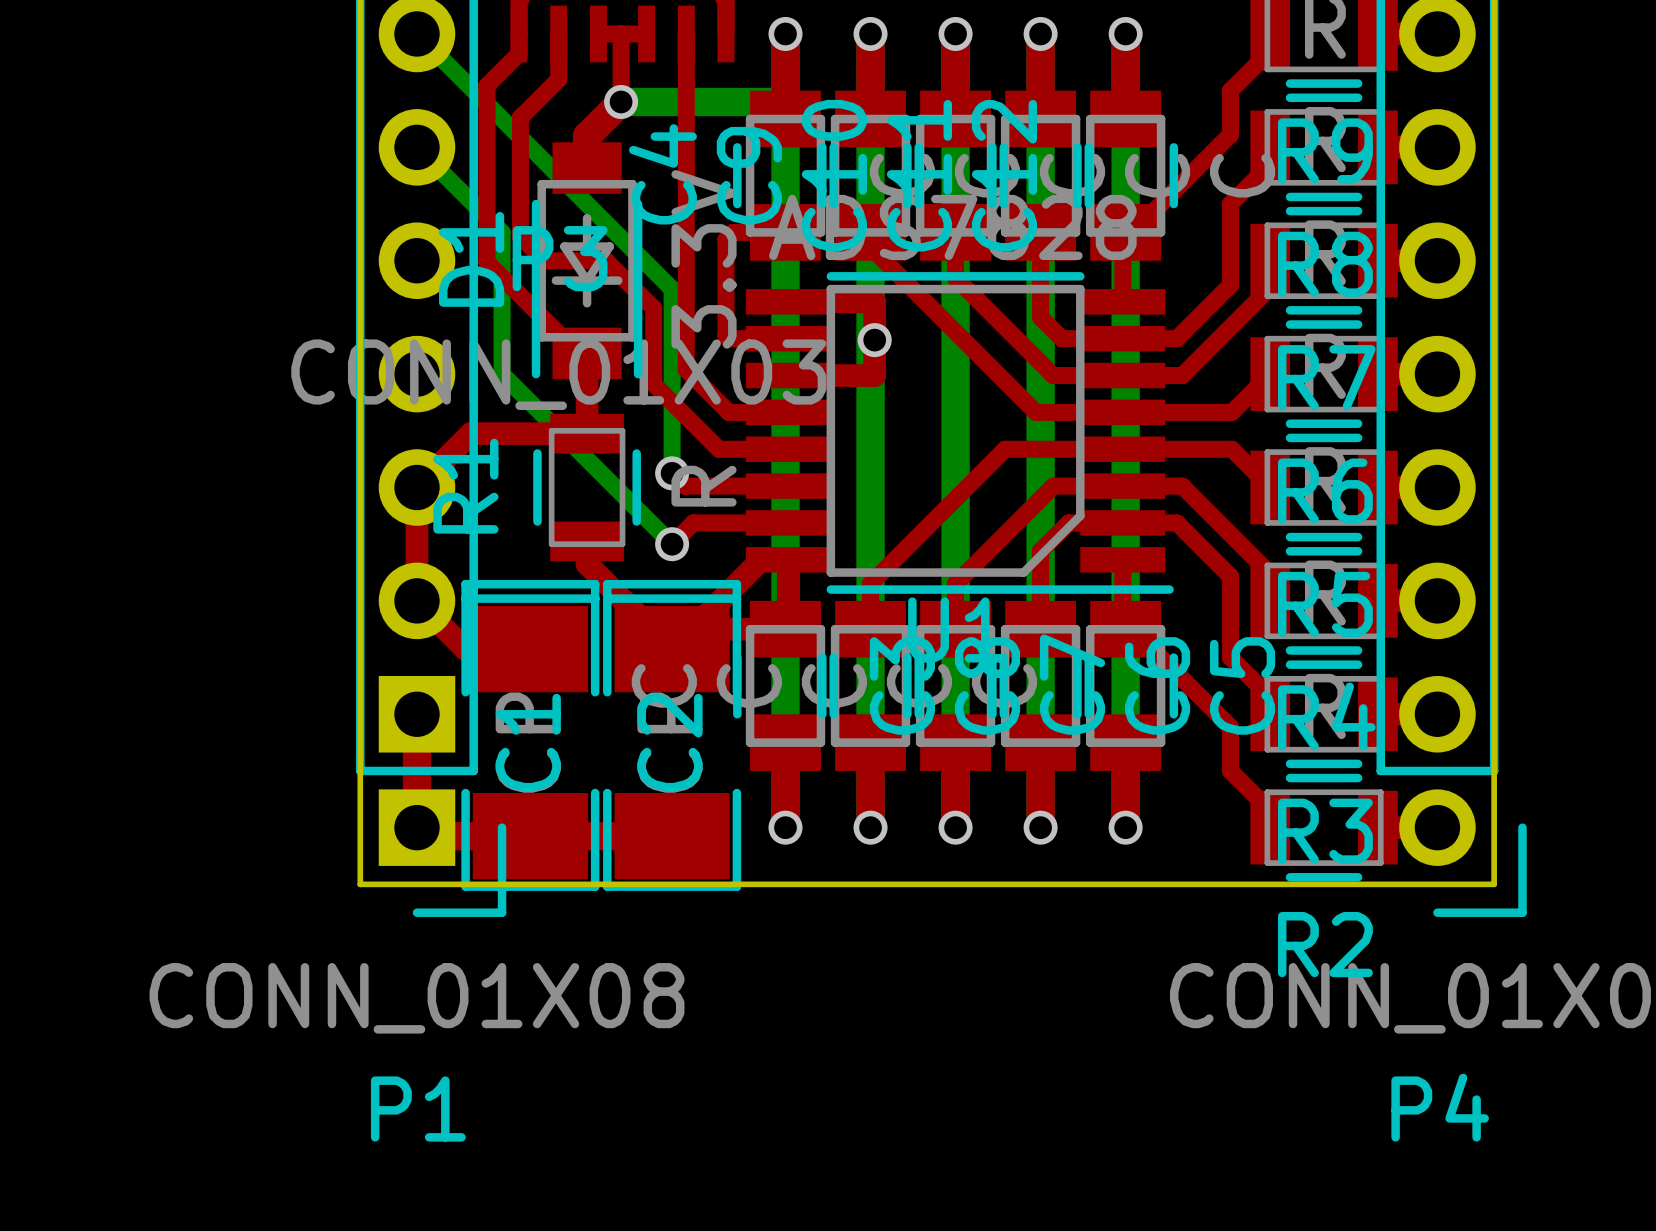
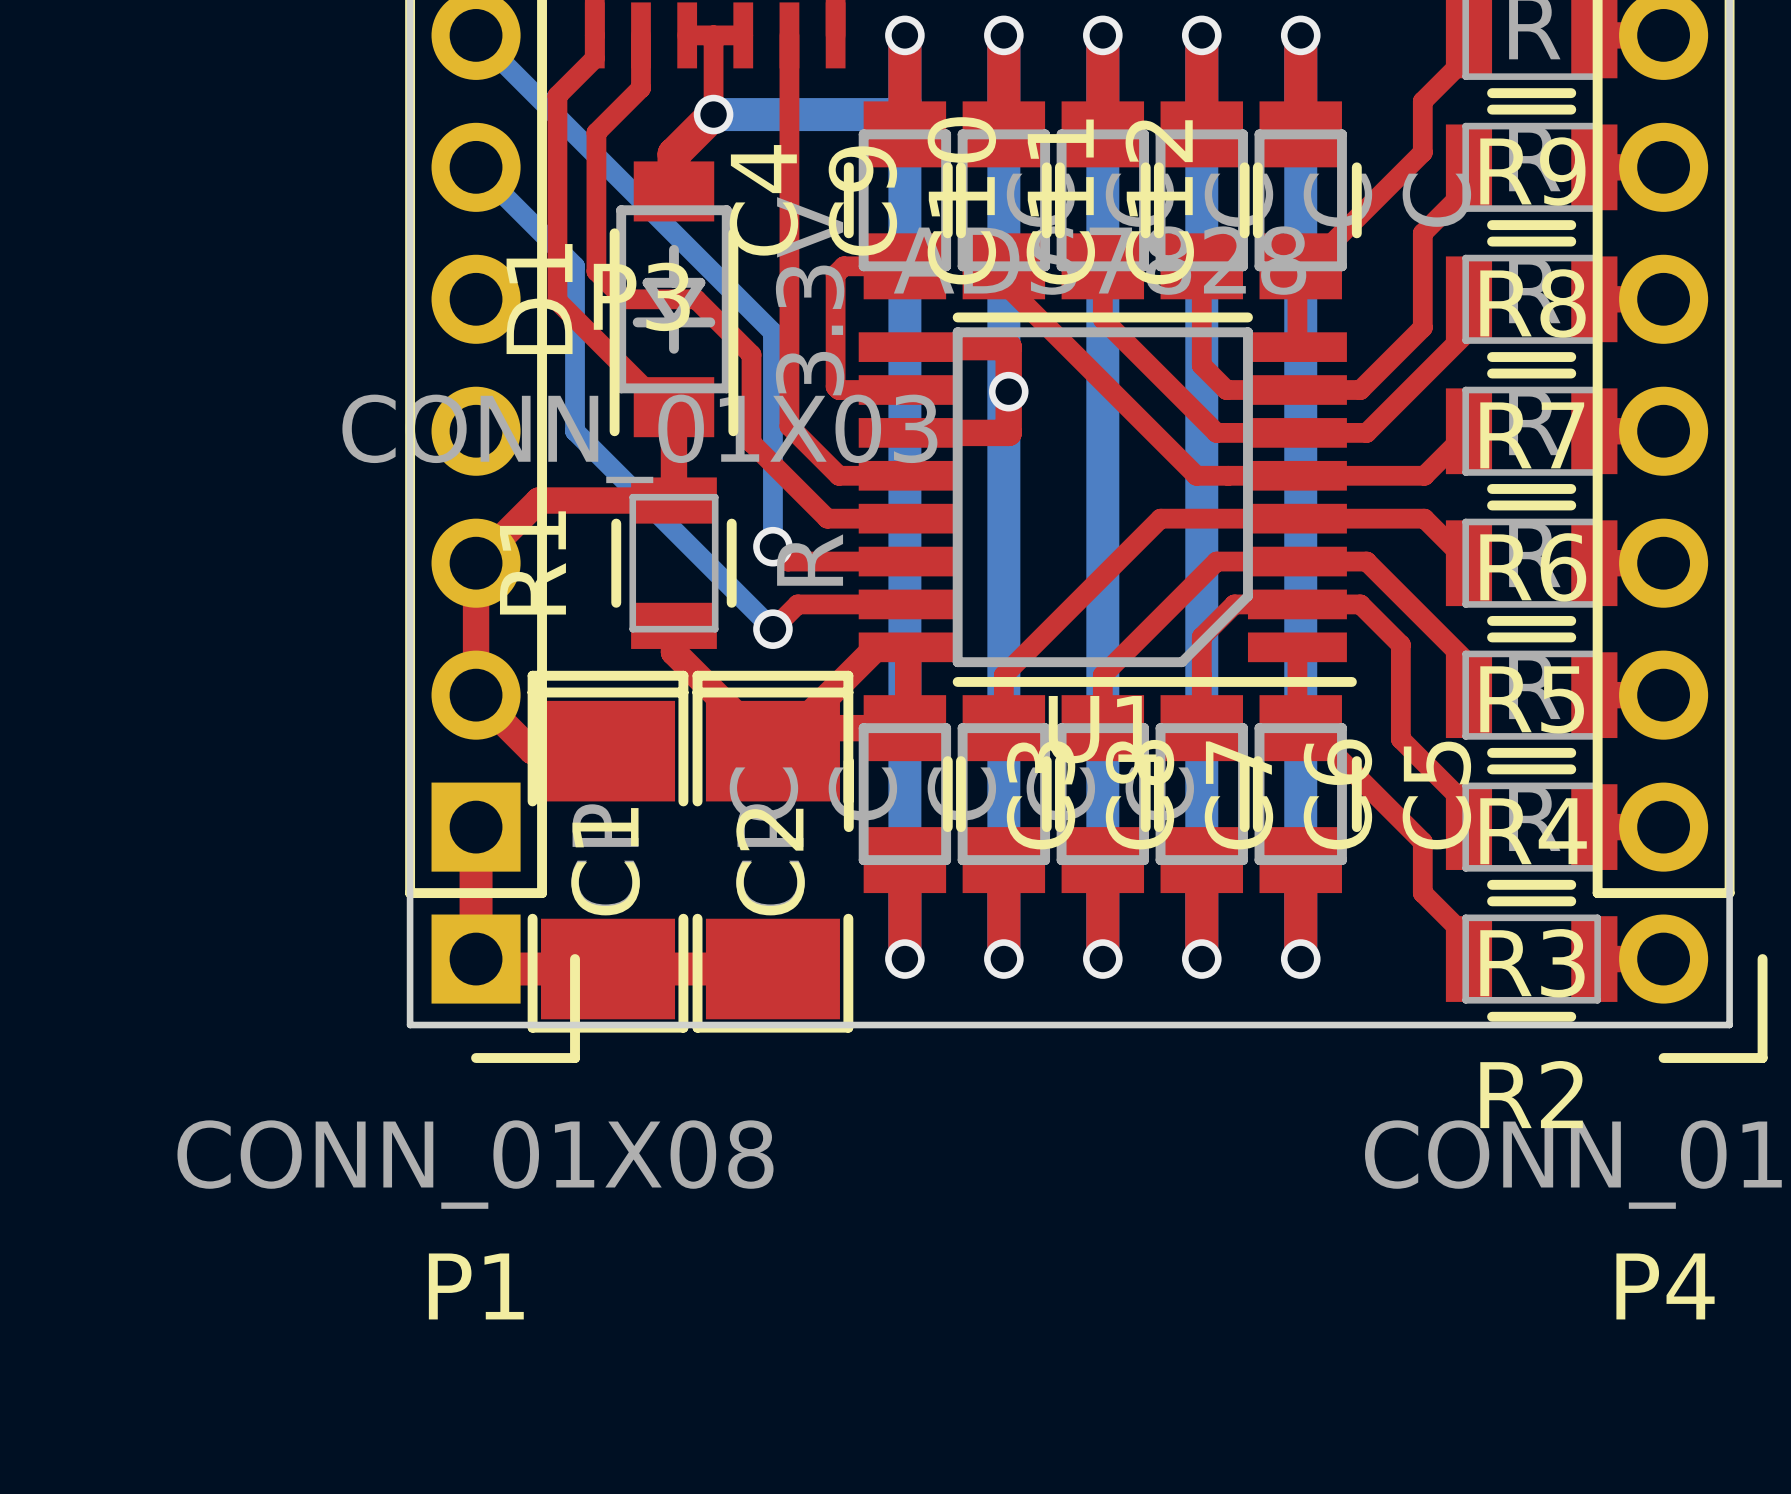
top track: (1211, 557) (1230, 576) (1230, 657) -> (1400, 644) (1400, 739) (1422, 761)

